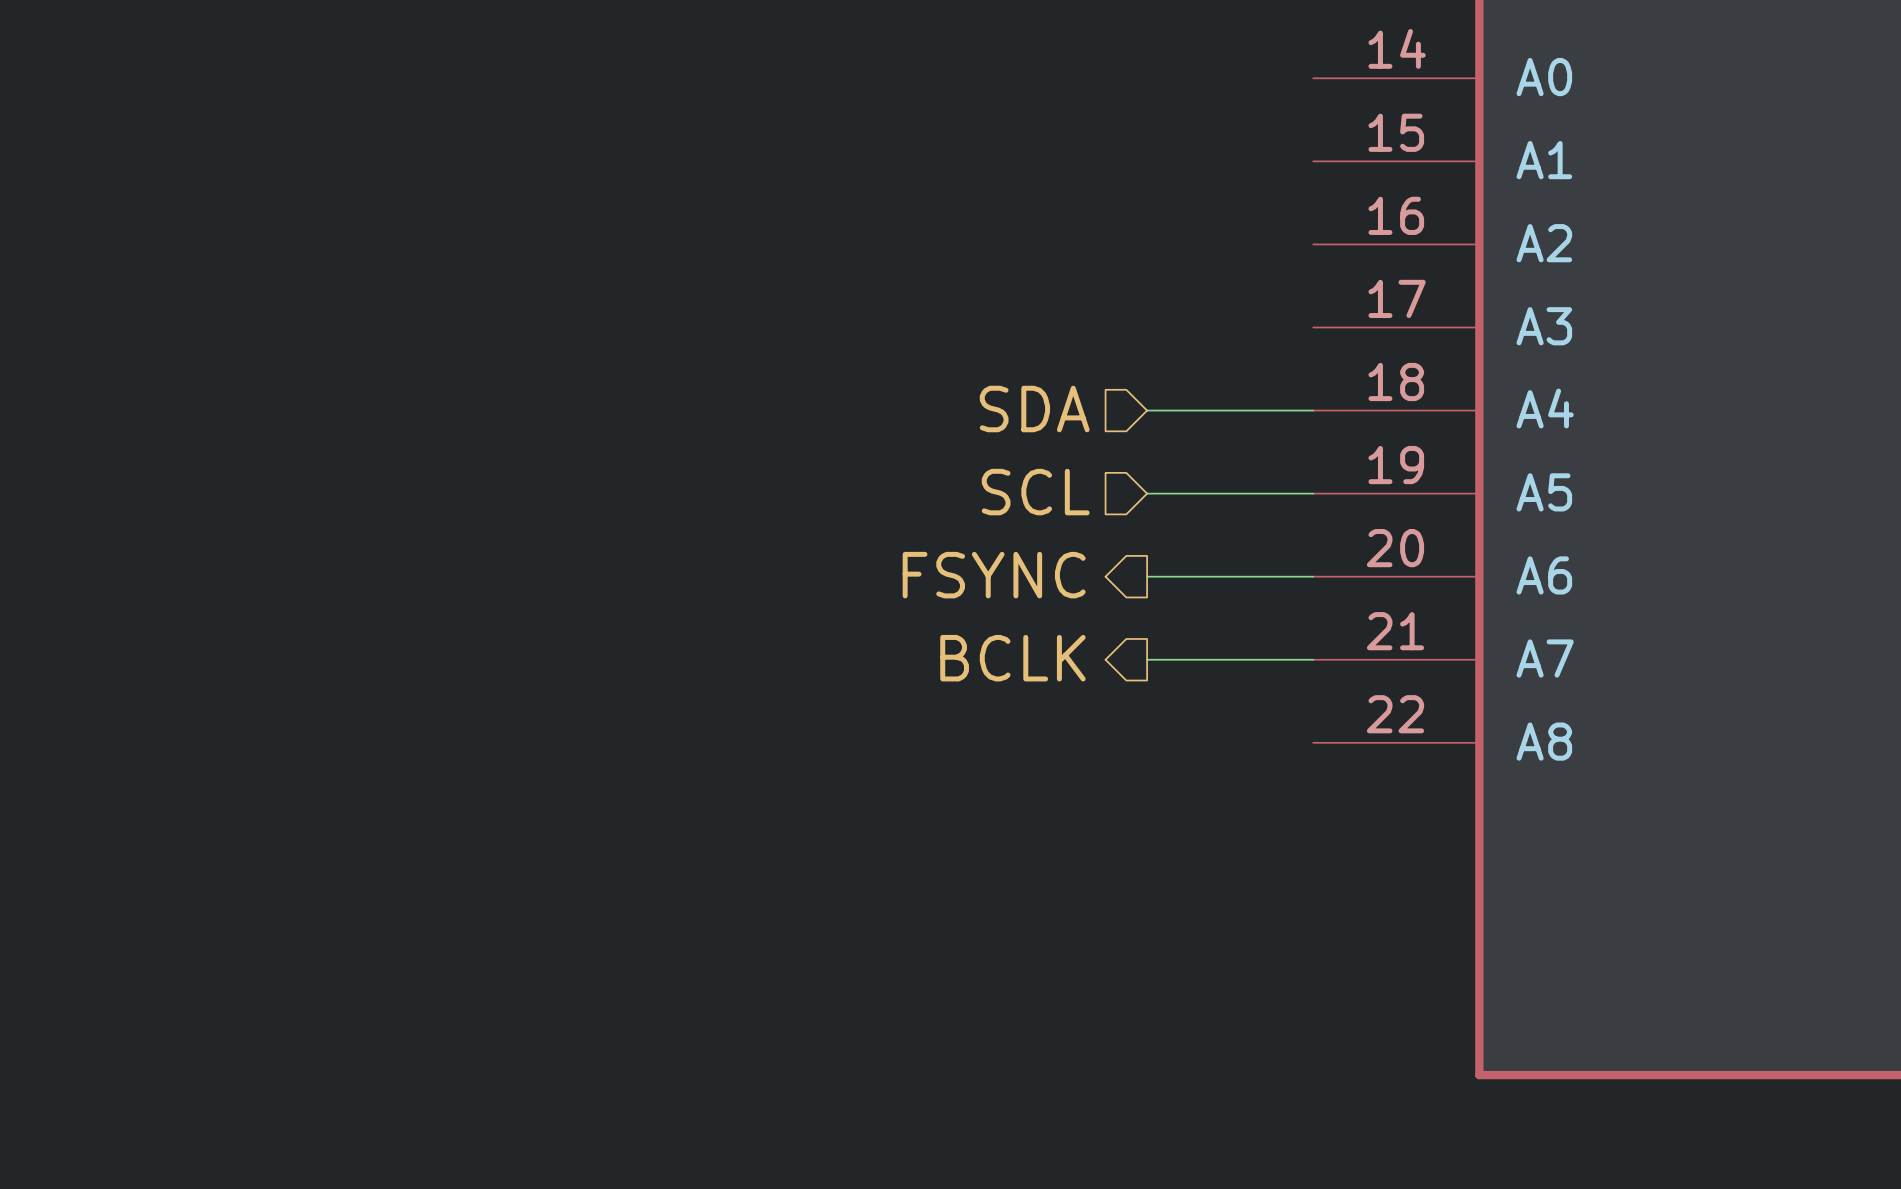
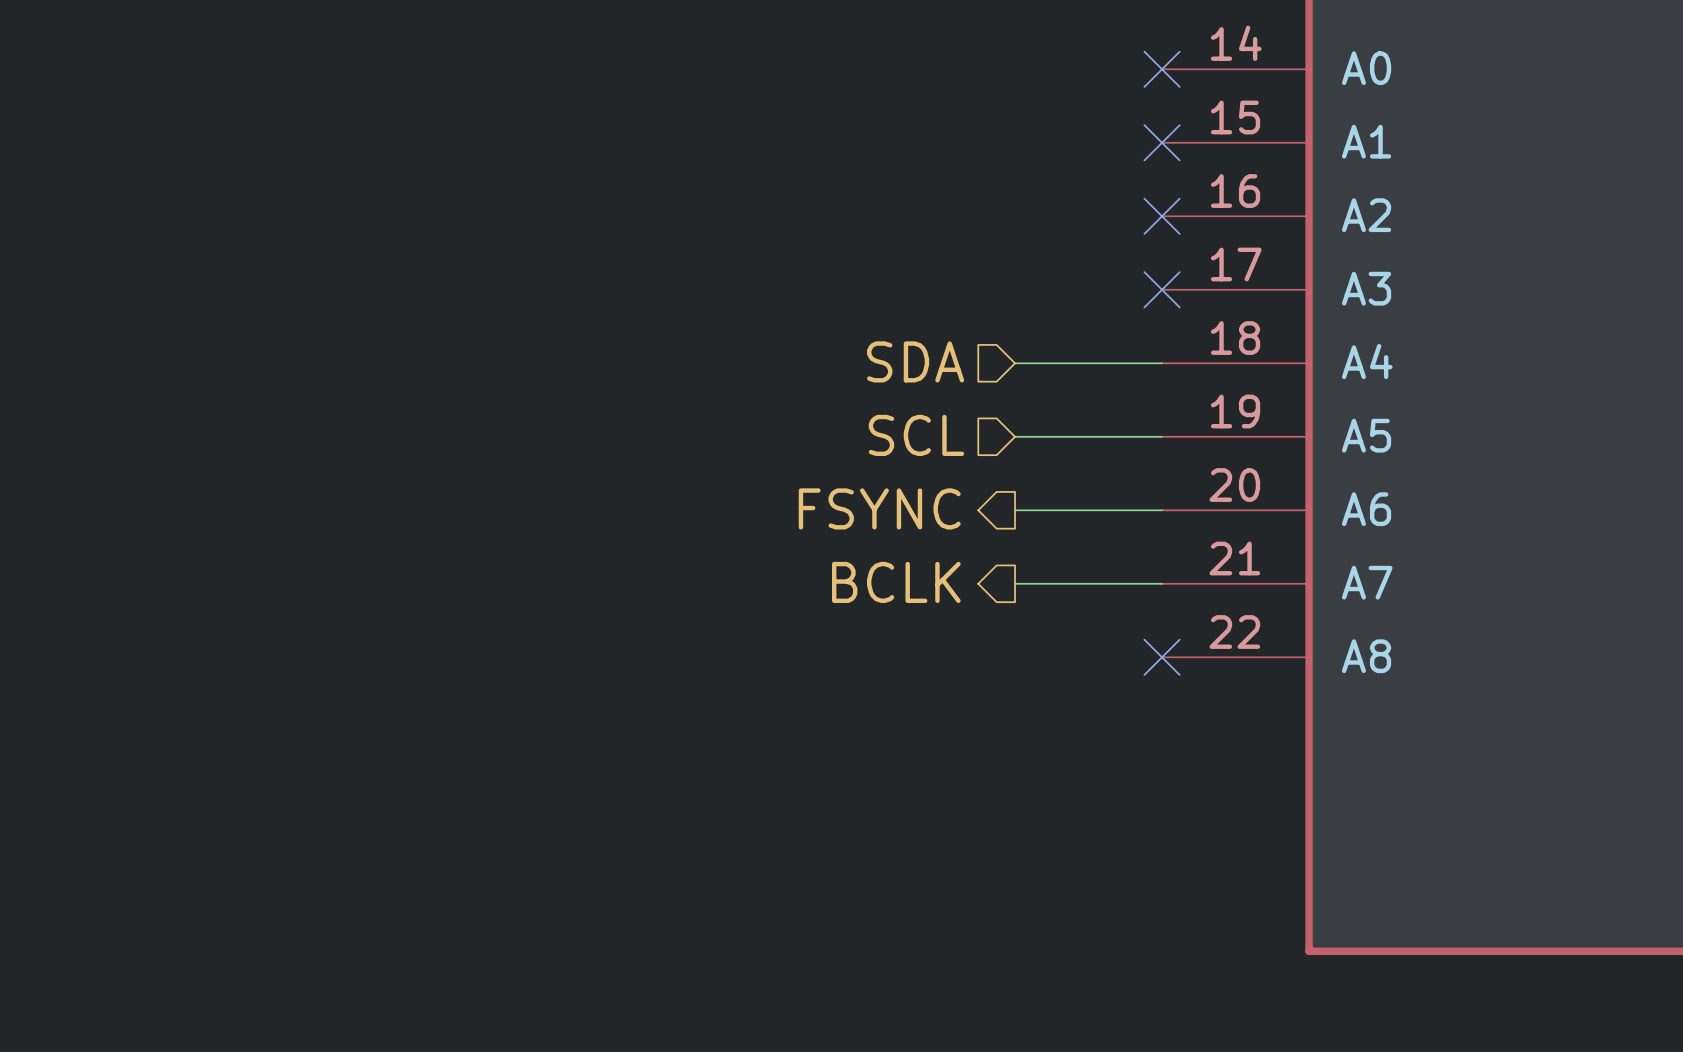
no-connect mark: none -> (1162, 69)
no-connect mark: none -> (1162, 142)
no-connect mark: none -> (1162, 216)
no-connect mark: none -> (1162, 289)
no-connect mark: none -> (1162, 657)

